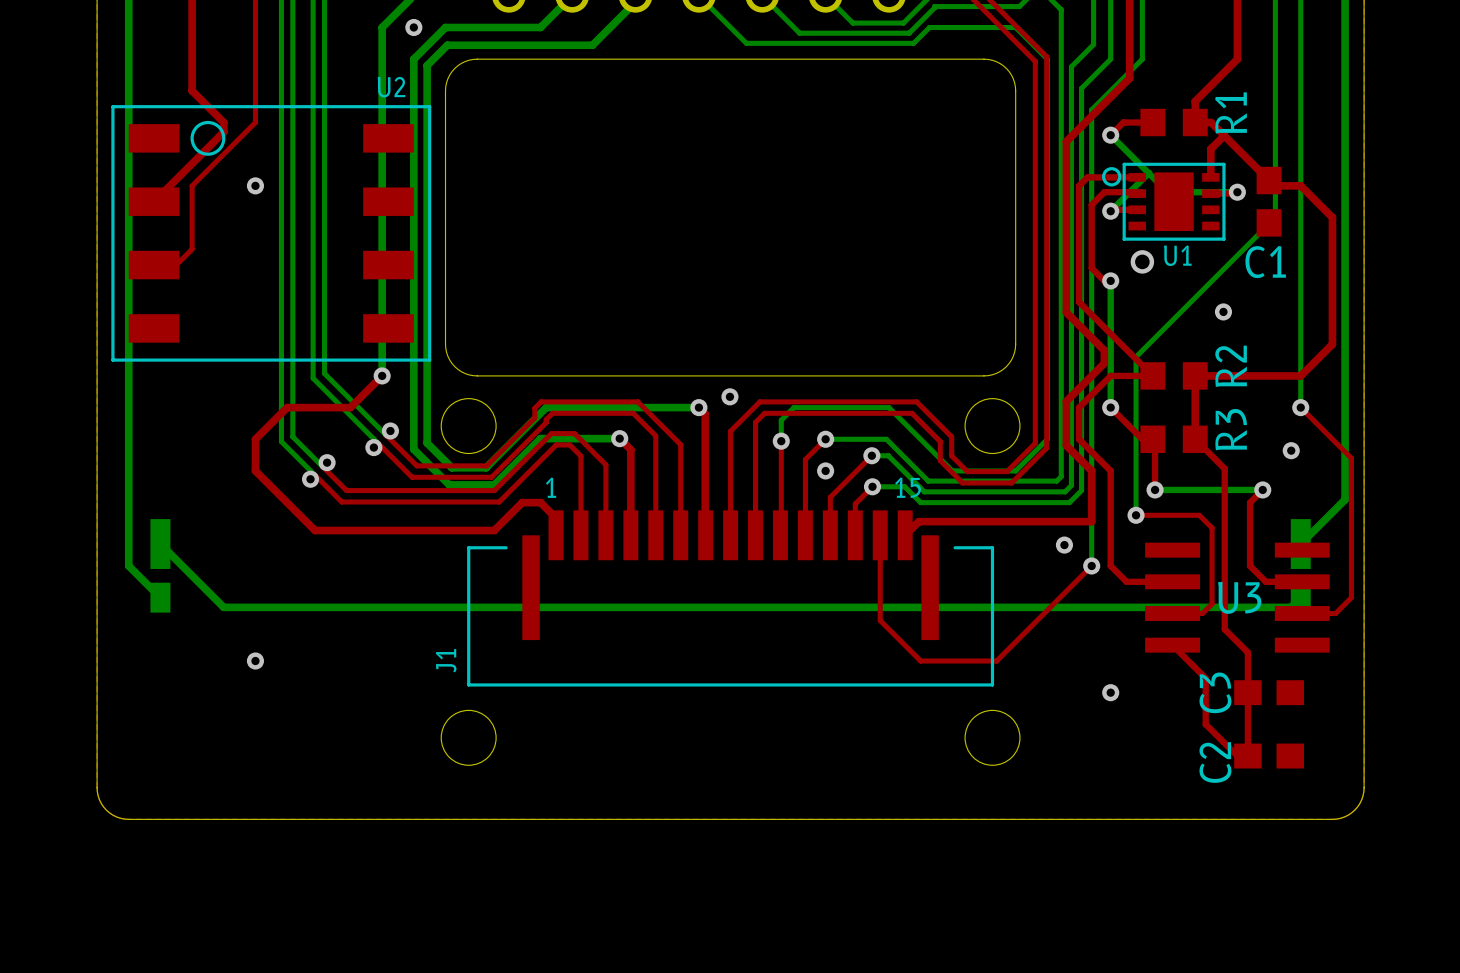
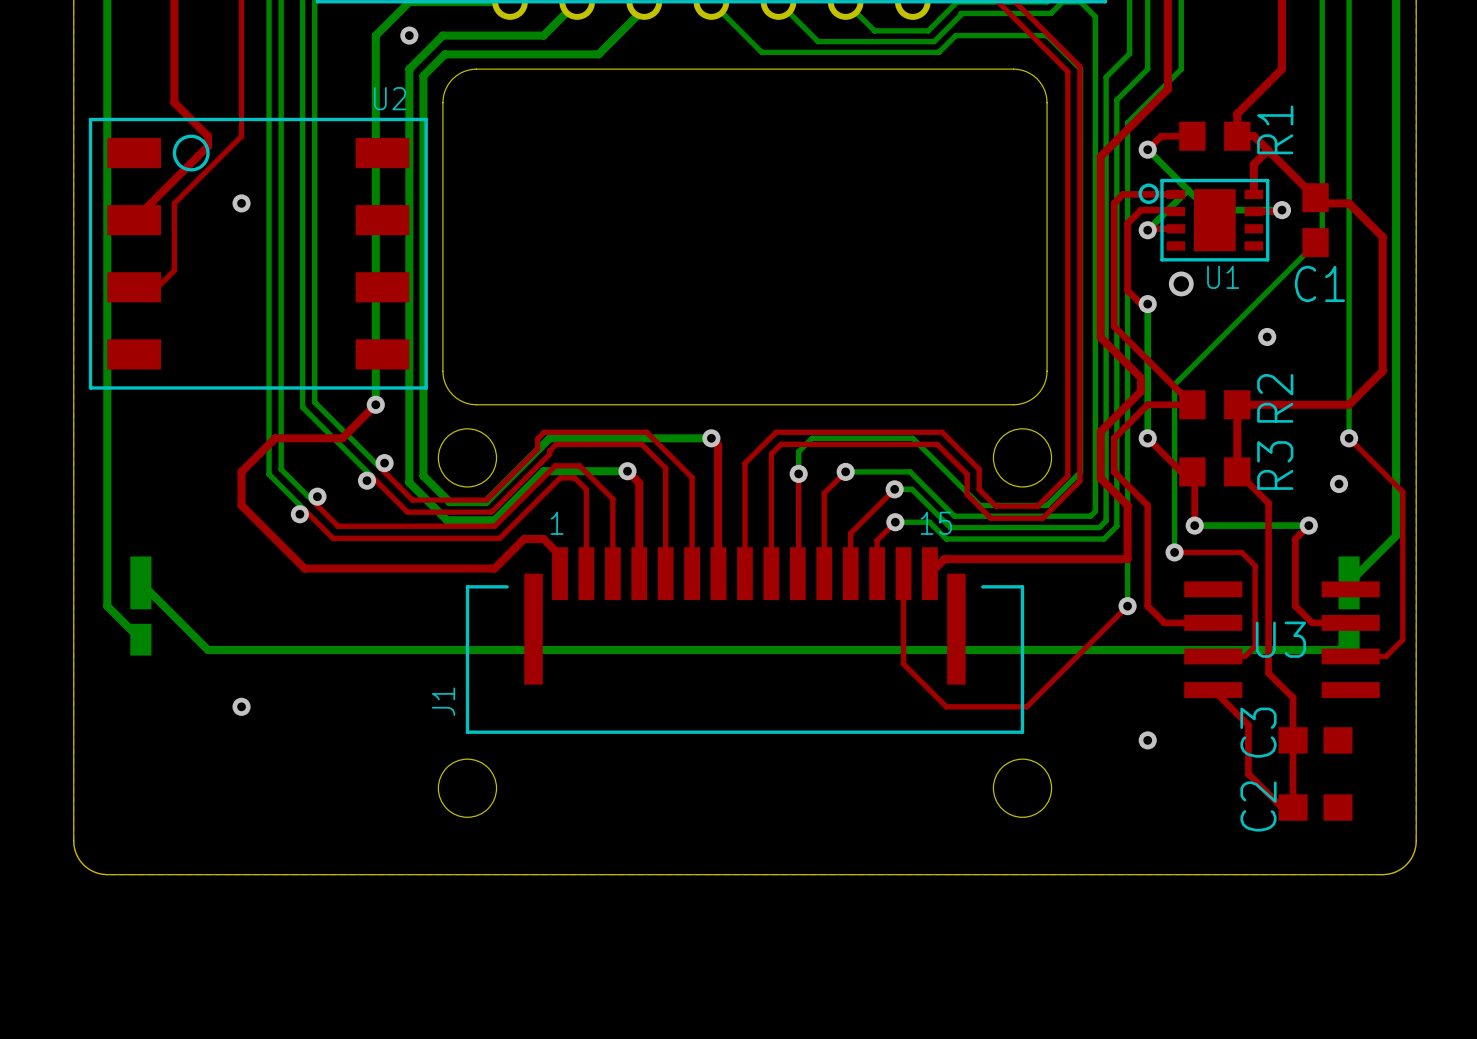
via: (729, 396) -> none
via: (825, 470) -> none
via: (1064, 545) -> none

